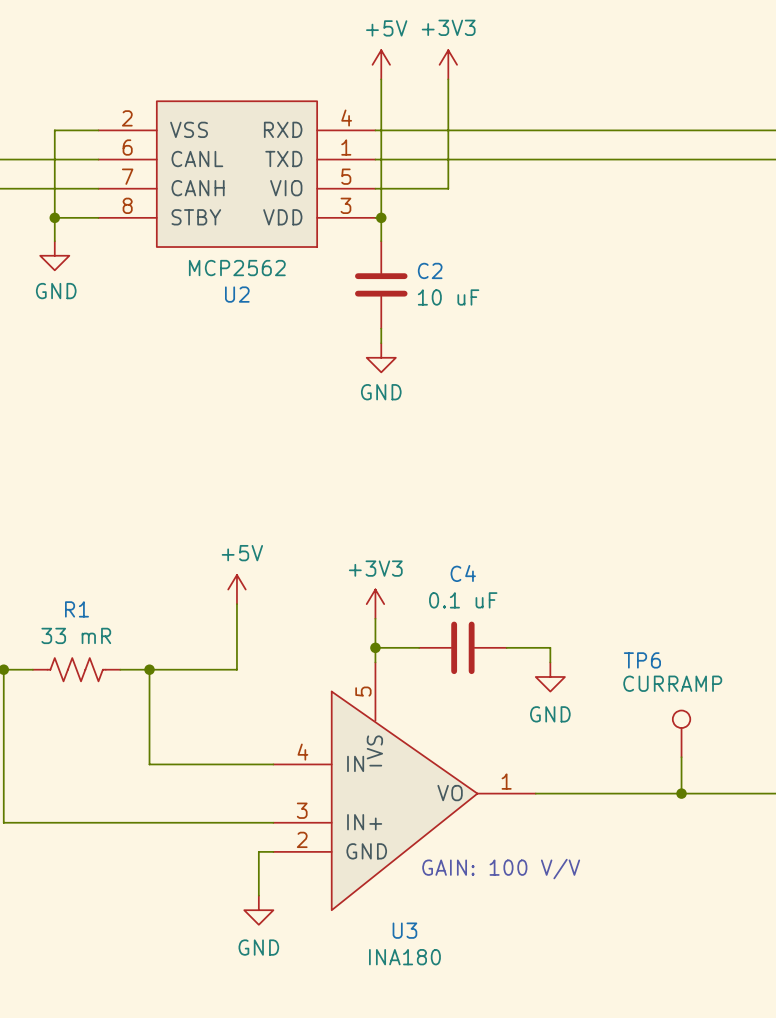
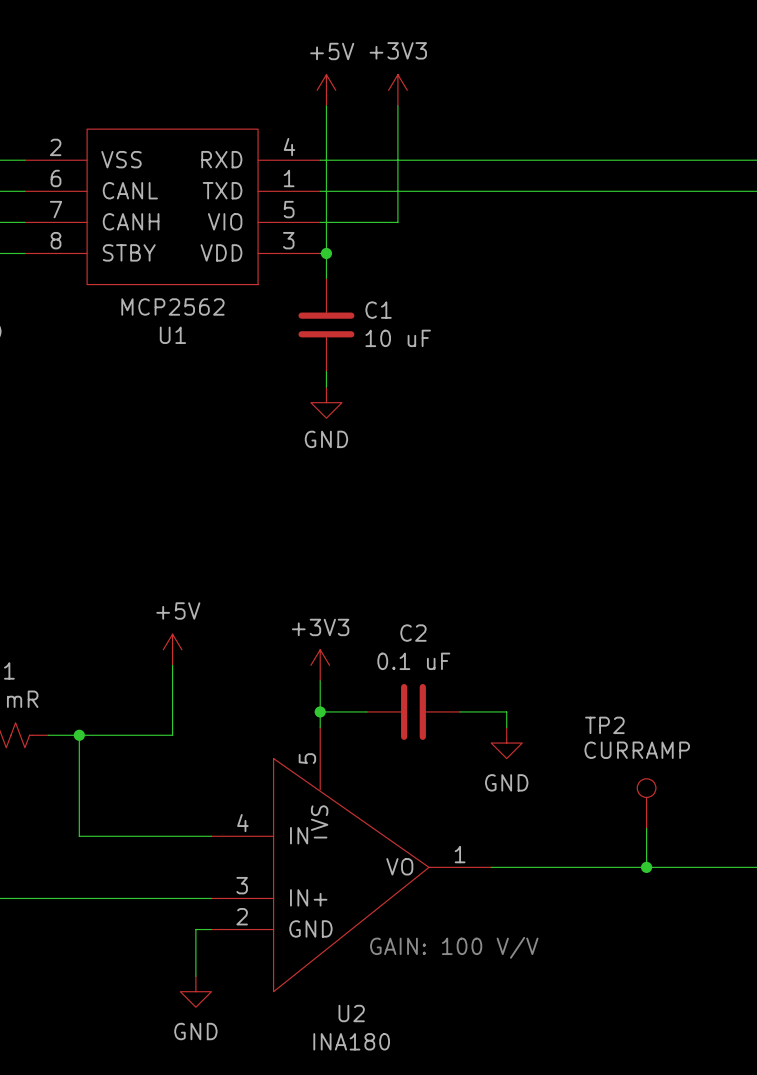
C2 name: C2 (430, 270) -> C1 (378, 310)
U2 name: U2 (237, 294) -> U1 (172, 335)
C4 name: C4 (463, 573) -> C2 (413, 633)
TP6 name: TP6 (642, 660) -> TP2 (604, 725)
U3 name: U3 (404, 930) -> U2 (351, 1013)

